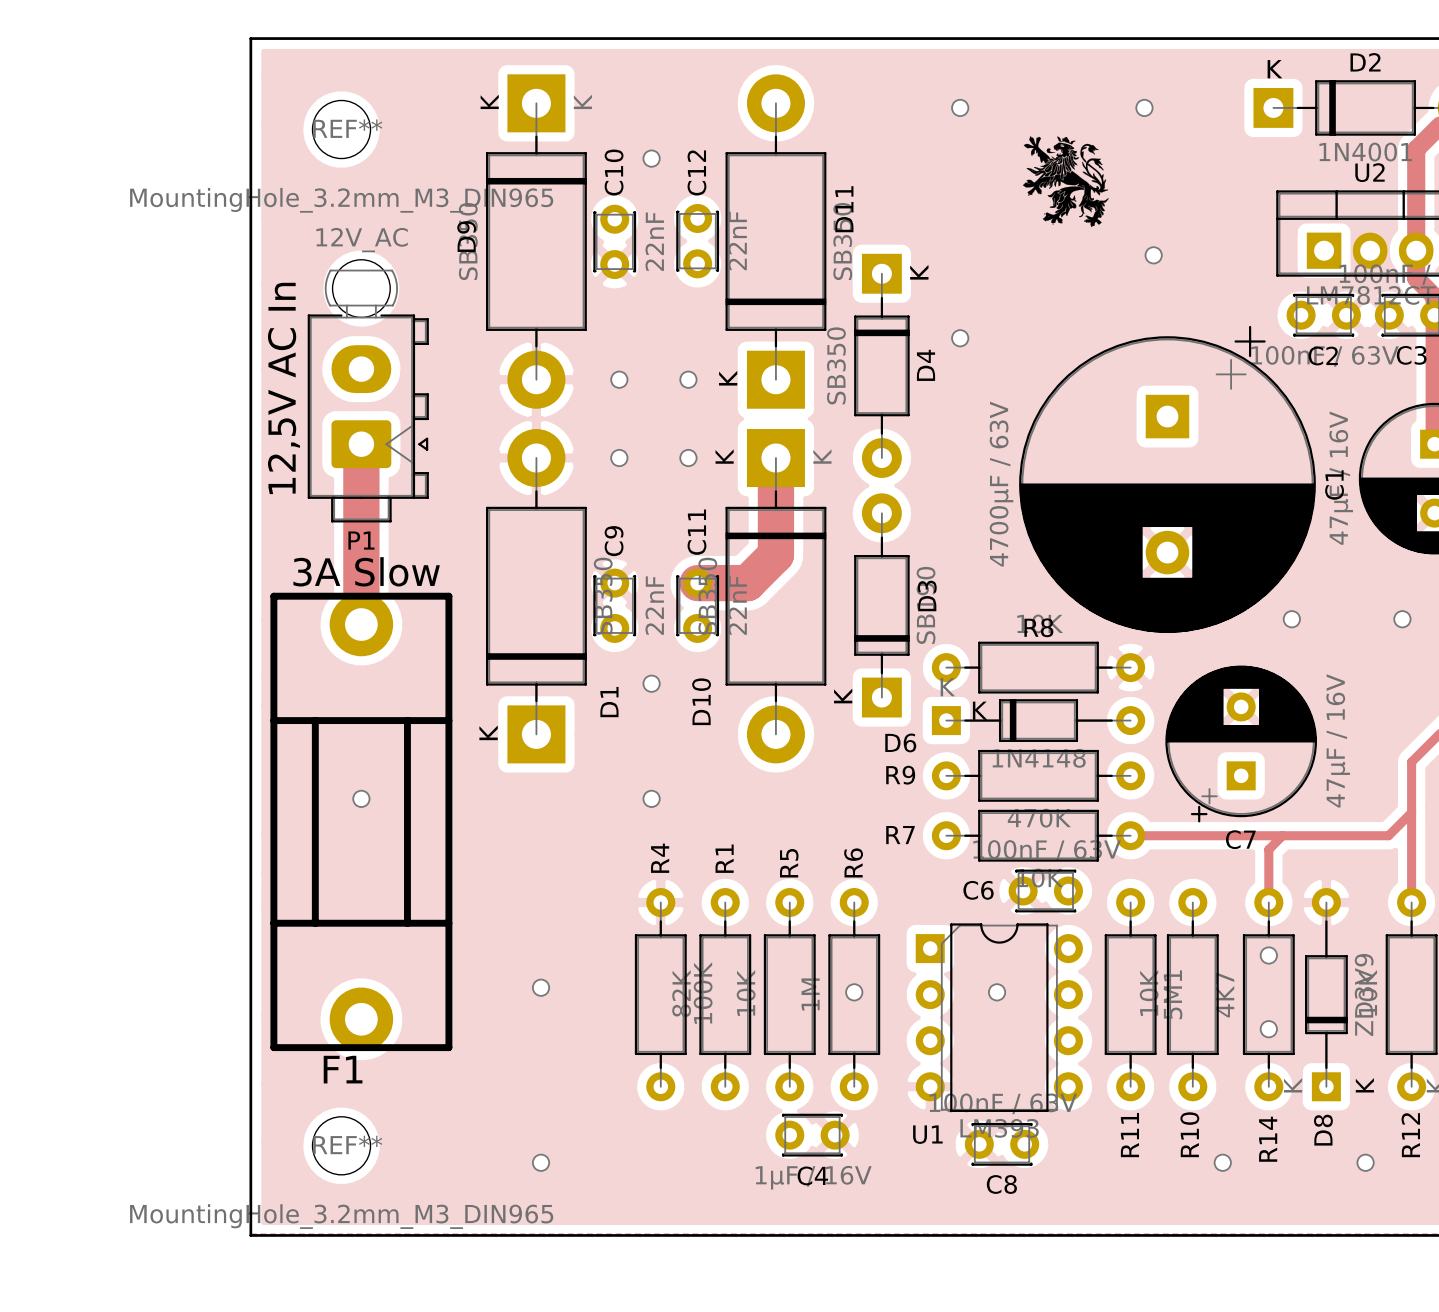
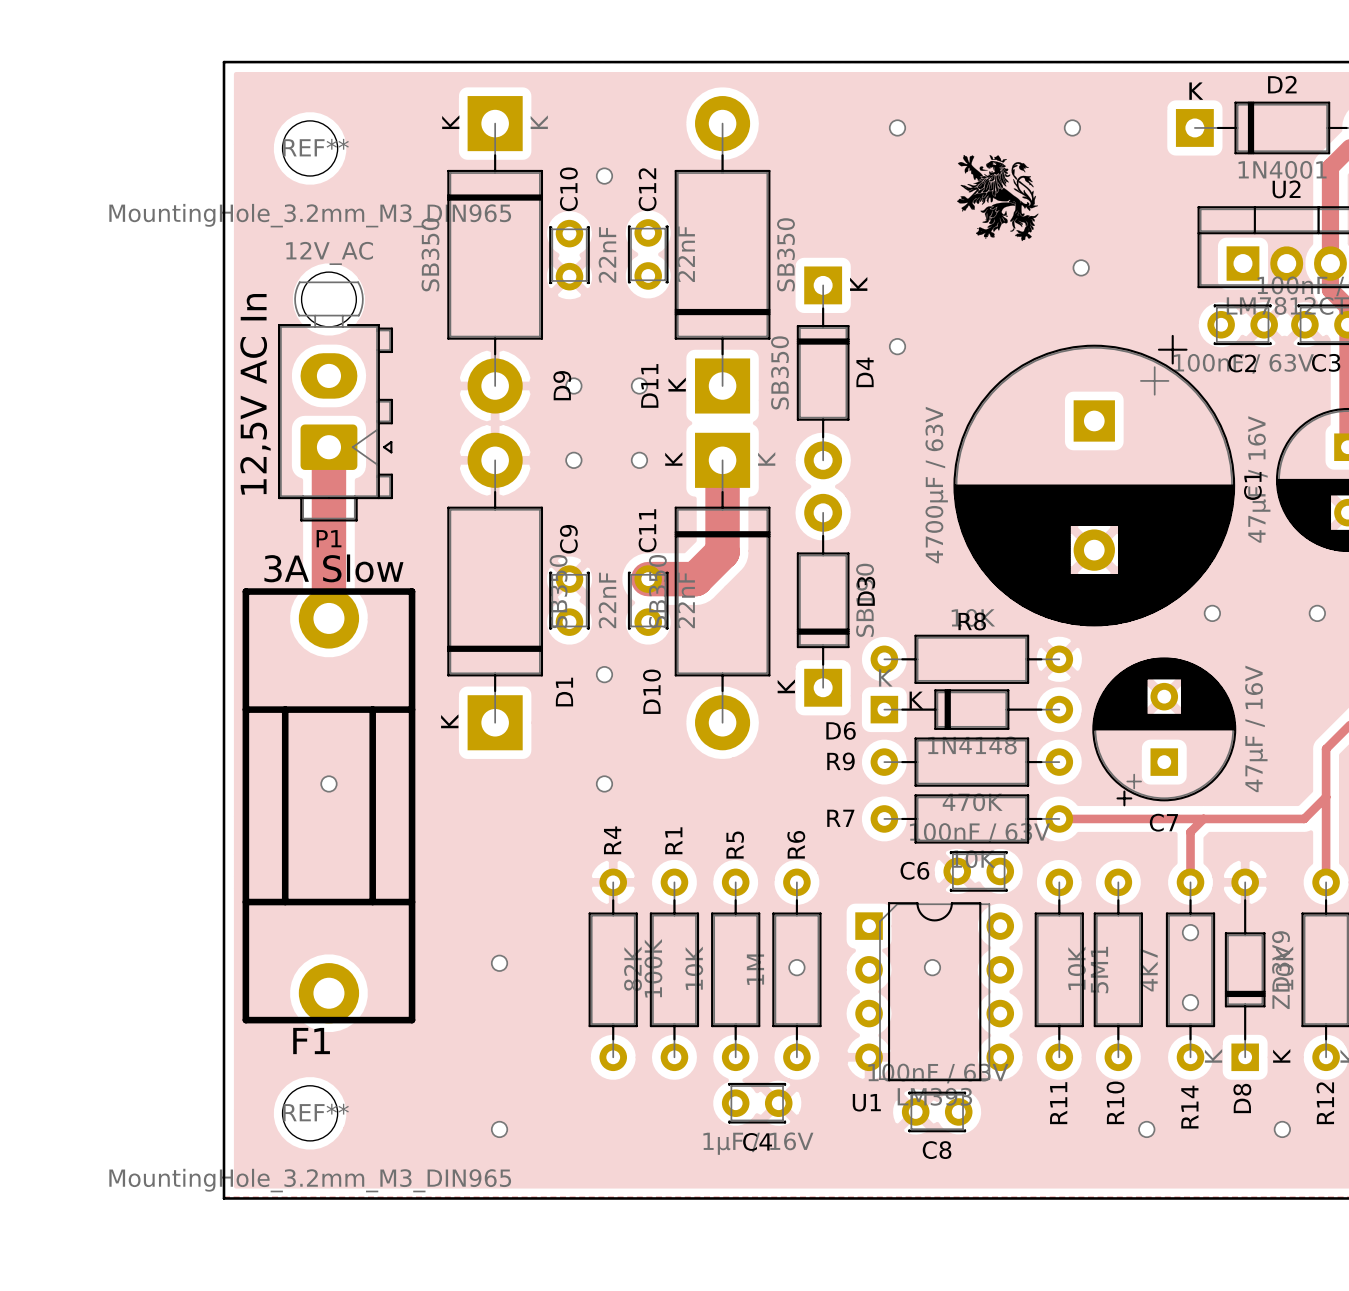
D11 name position: D11 (844, 209) -> D11 (649, 385)
D9 name position: D9 (466, 236) -> D9 (562, 385)

